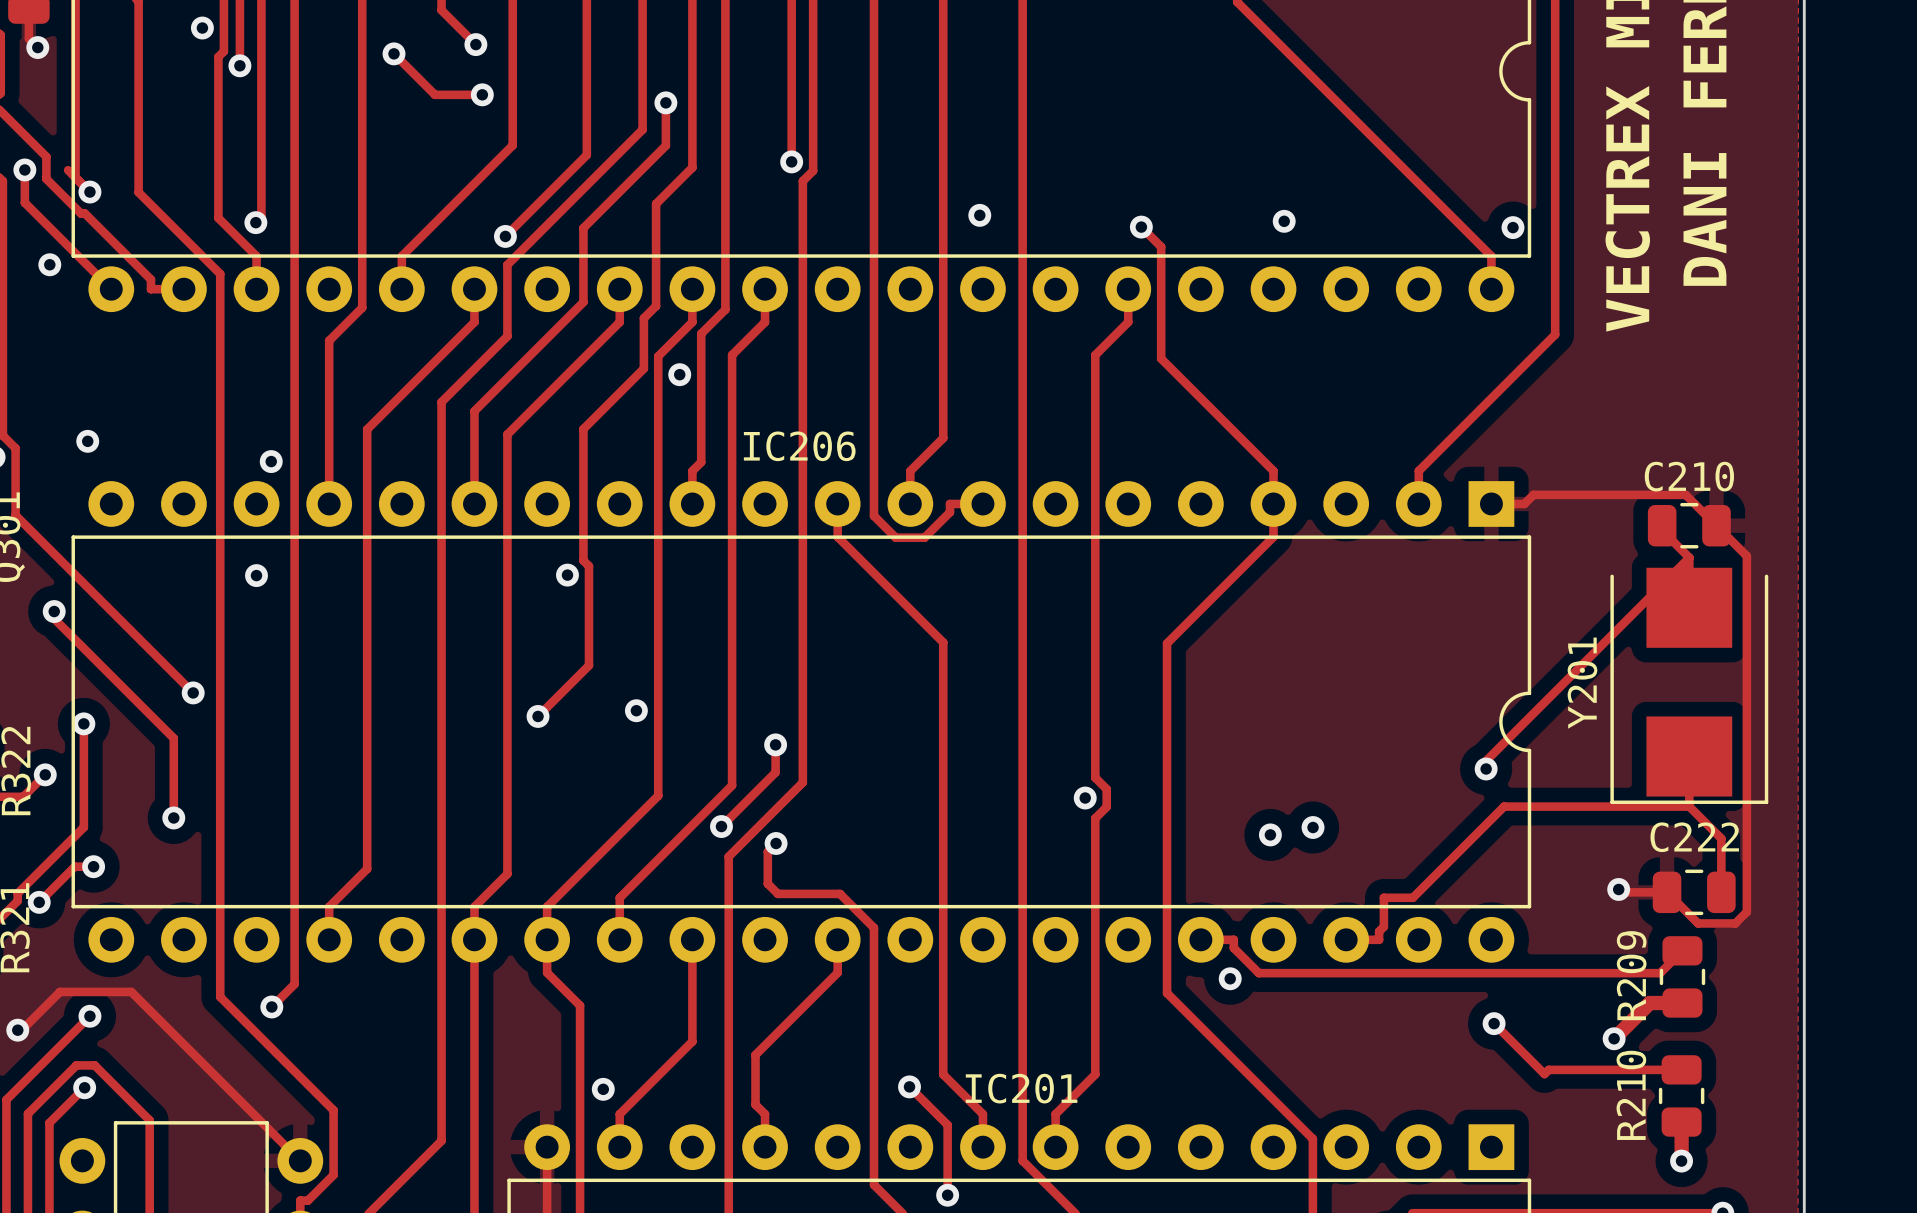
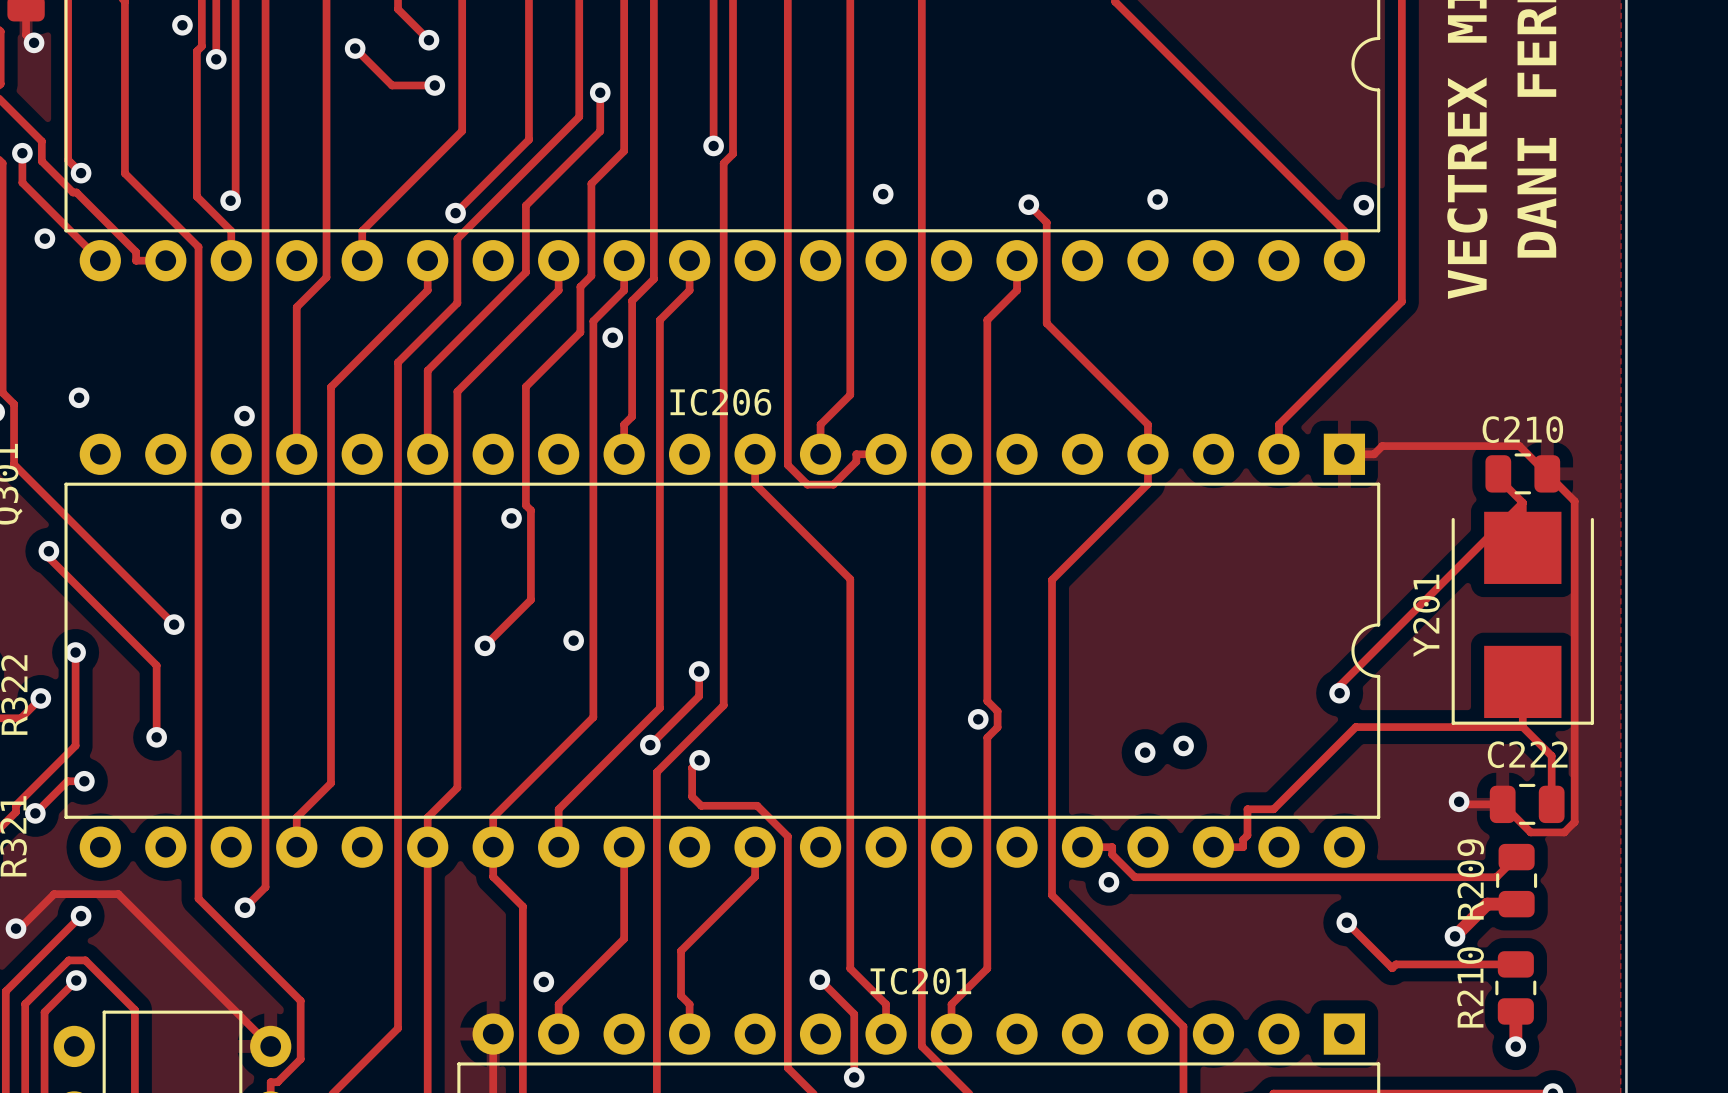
track: (68, 170) (75, 177) -> none

